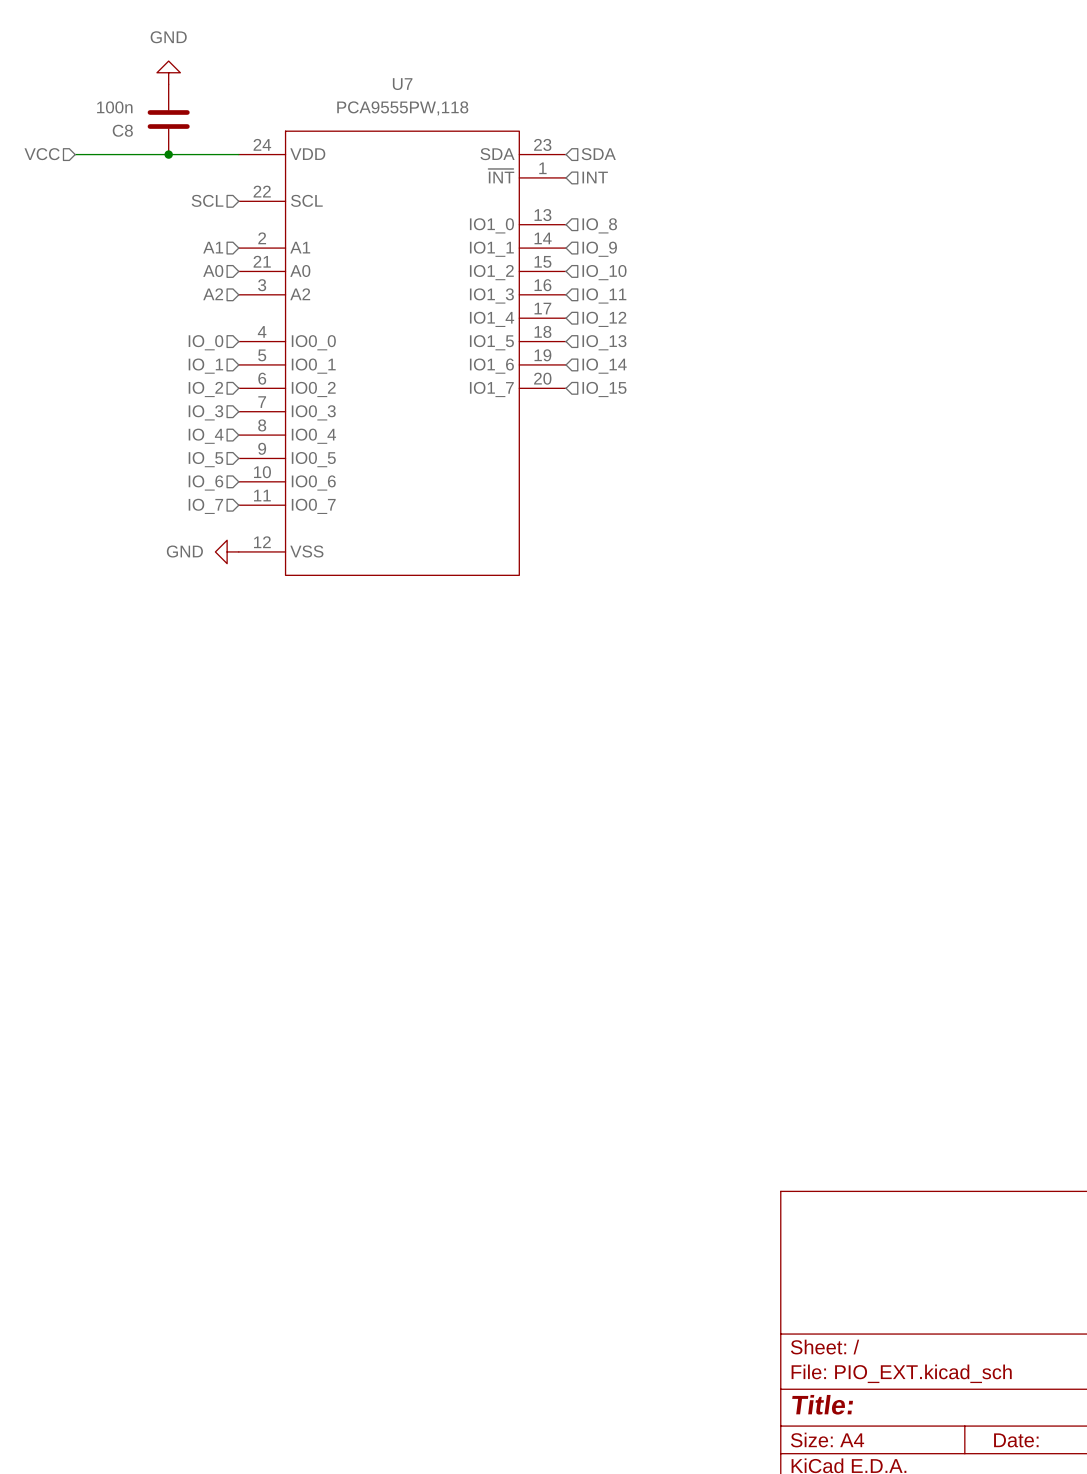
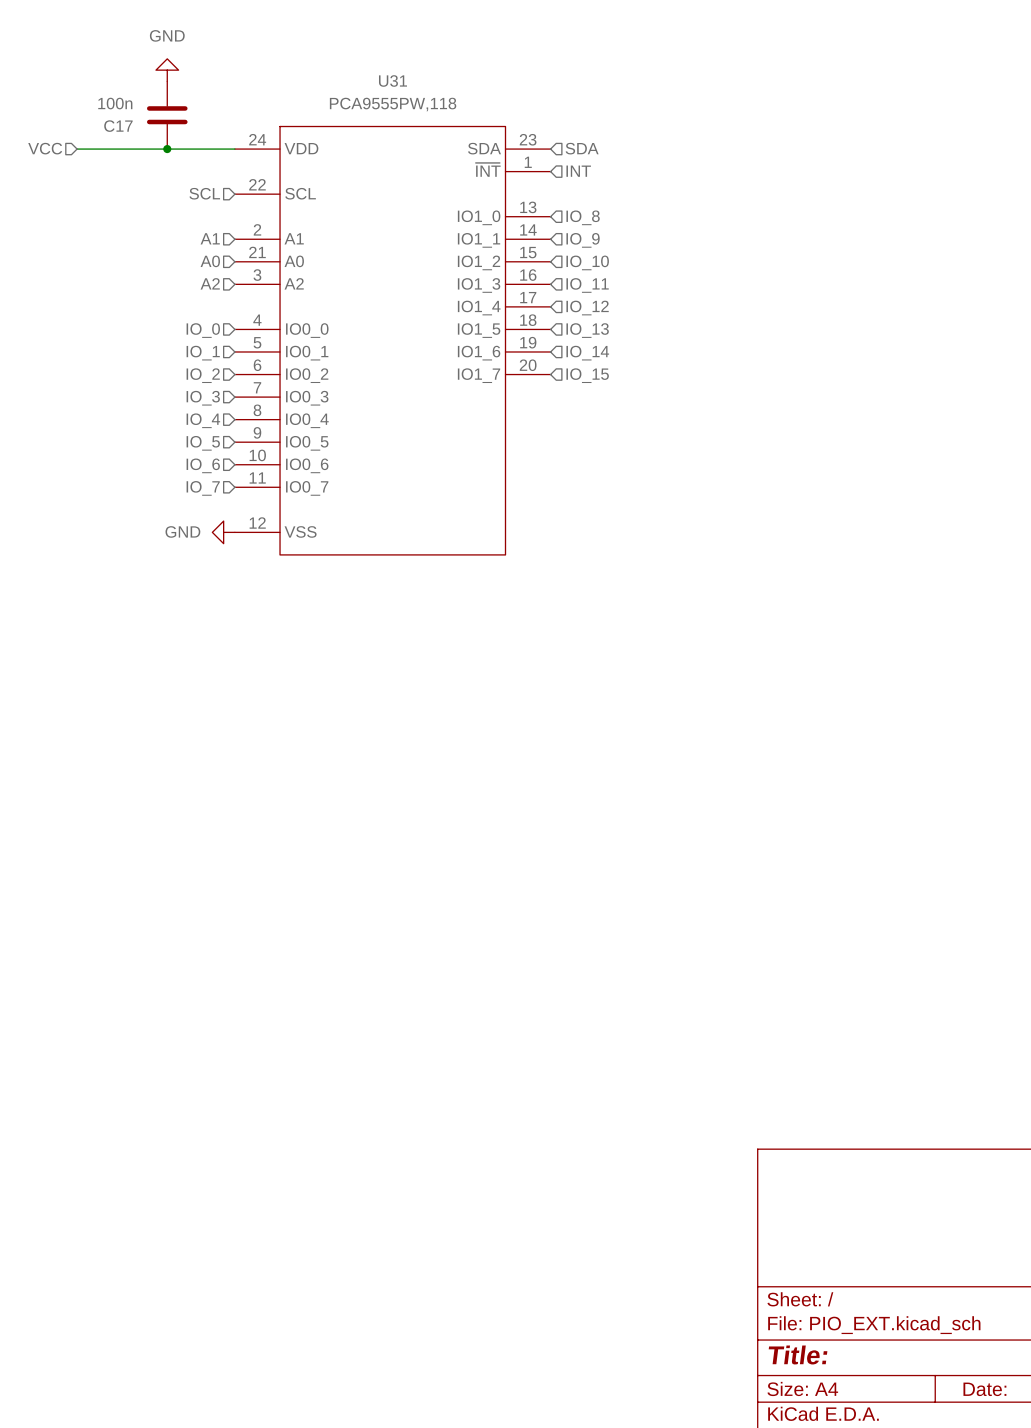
U7 name: U7 (402, 84) -> U31 (392, 80)
C8 name: C8 (122, 130) -> C17 (118, 126)

